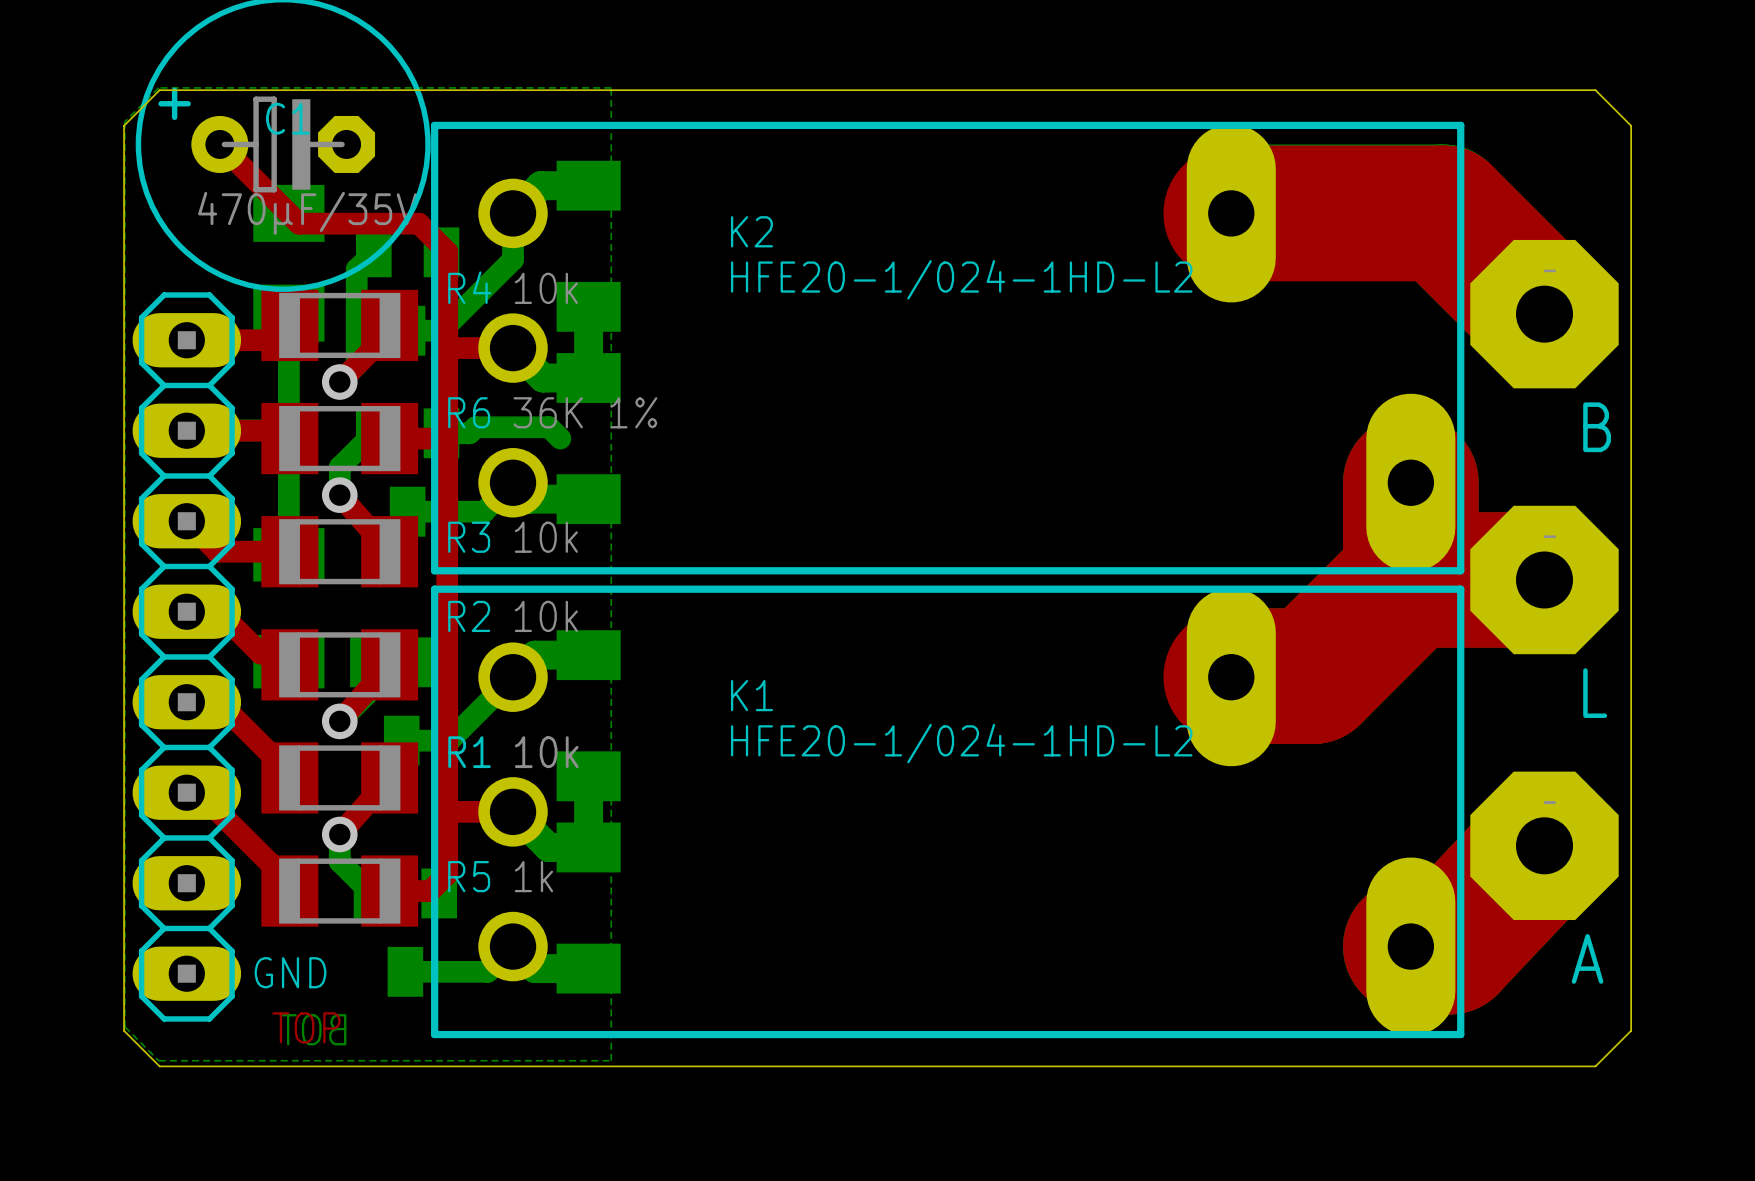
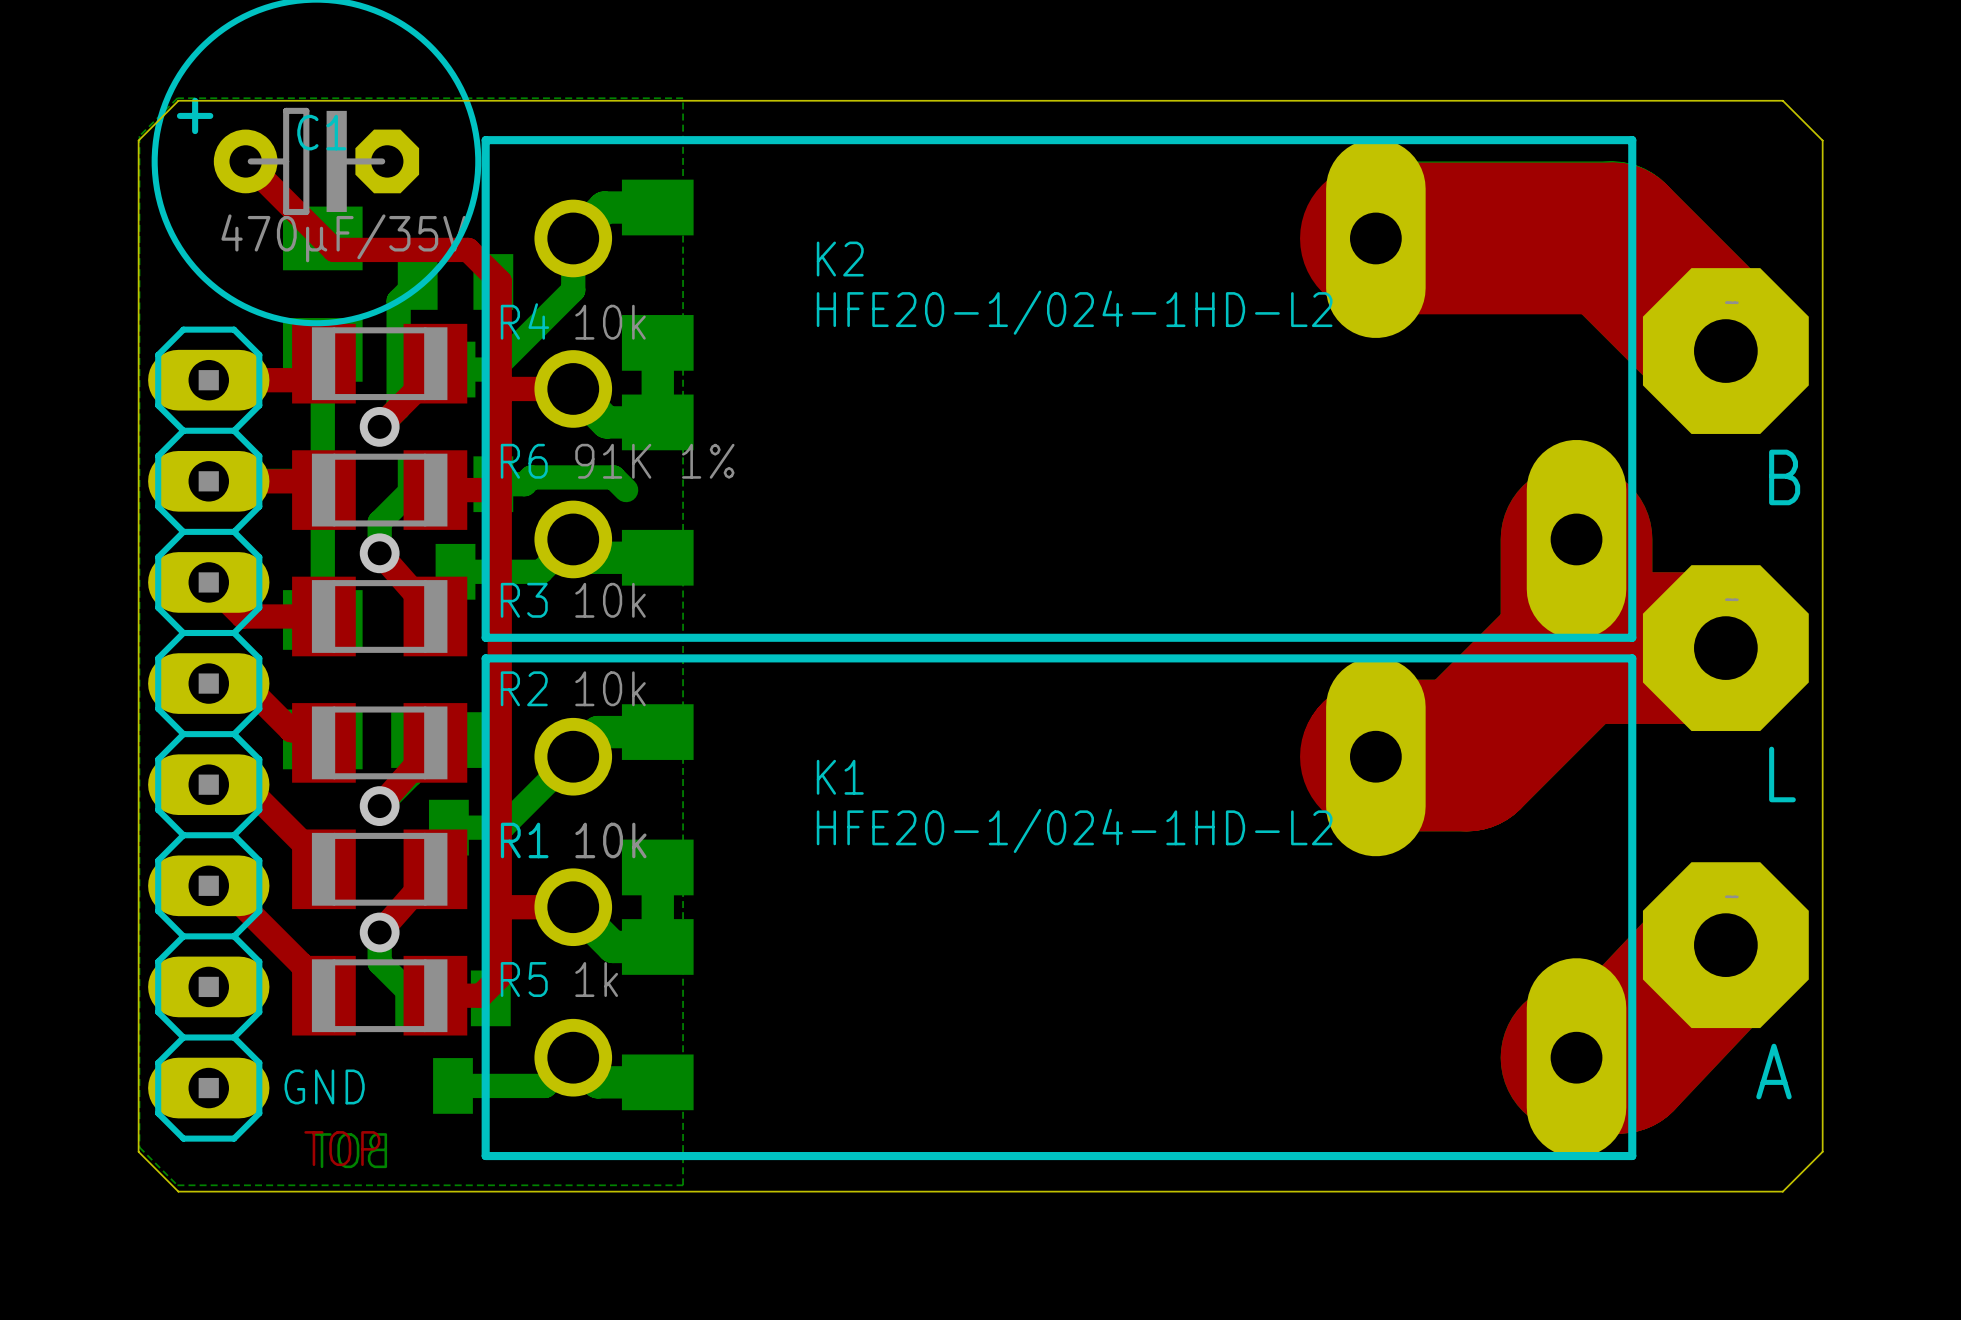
R6 value: 36K 1% (585, 412) -> 91K 1% (654, 461)

